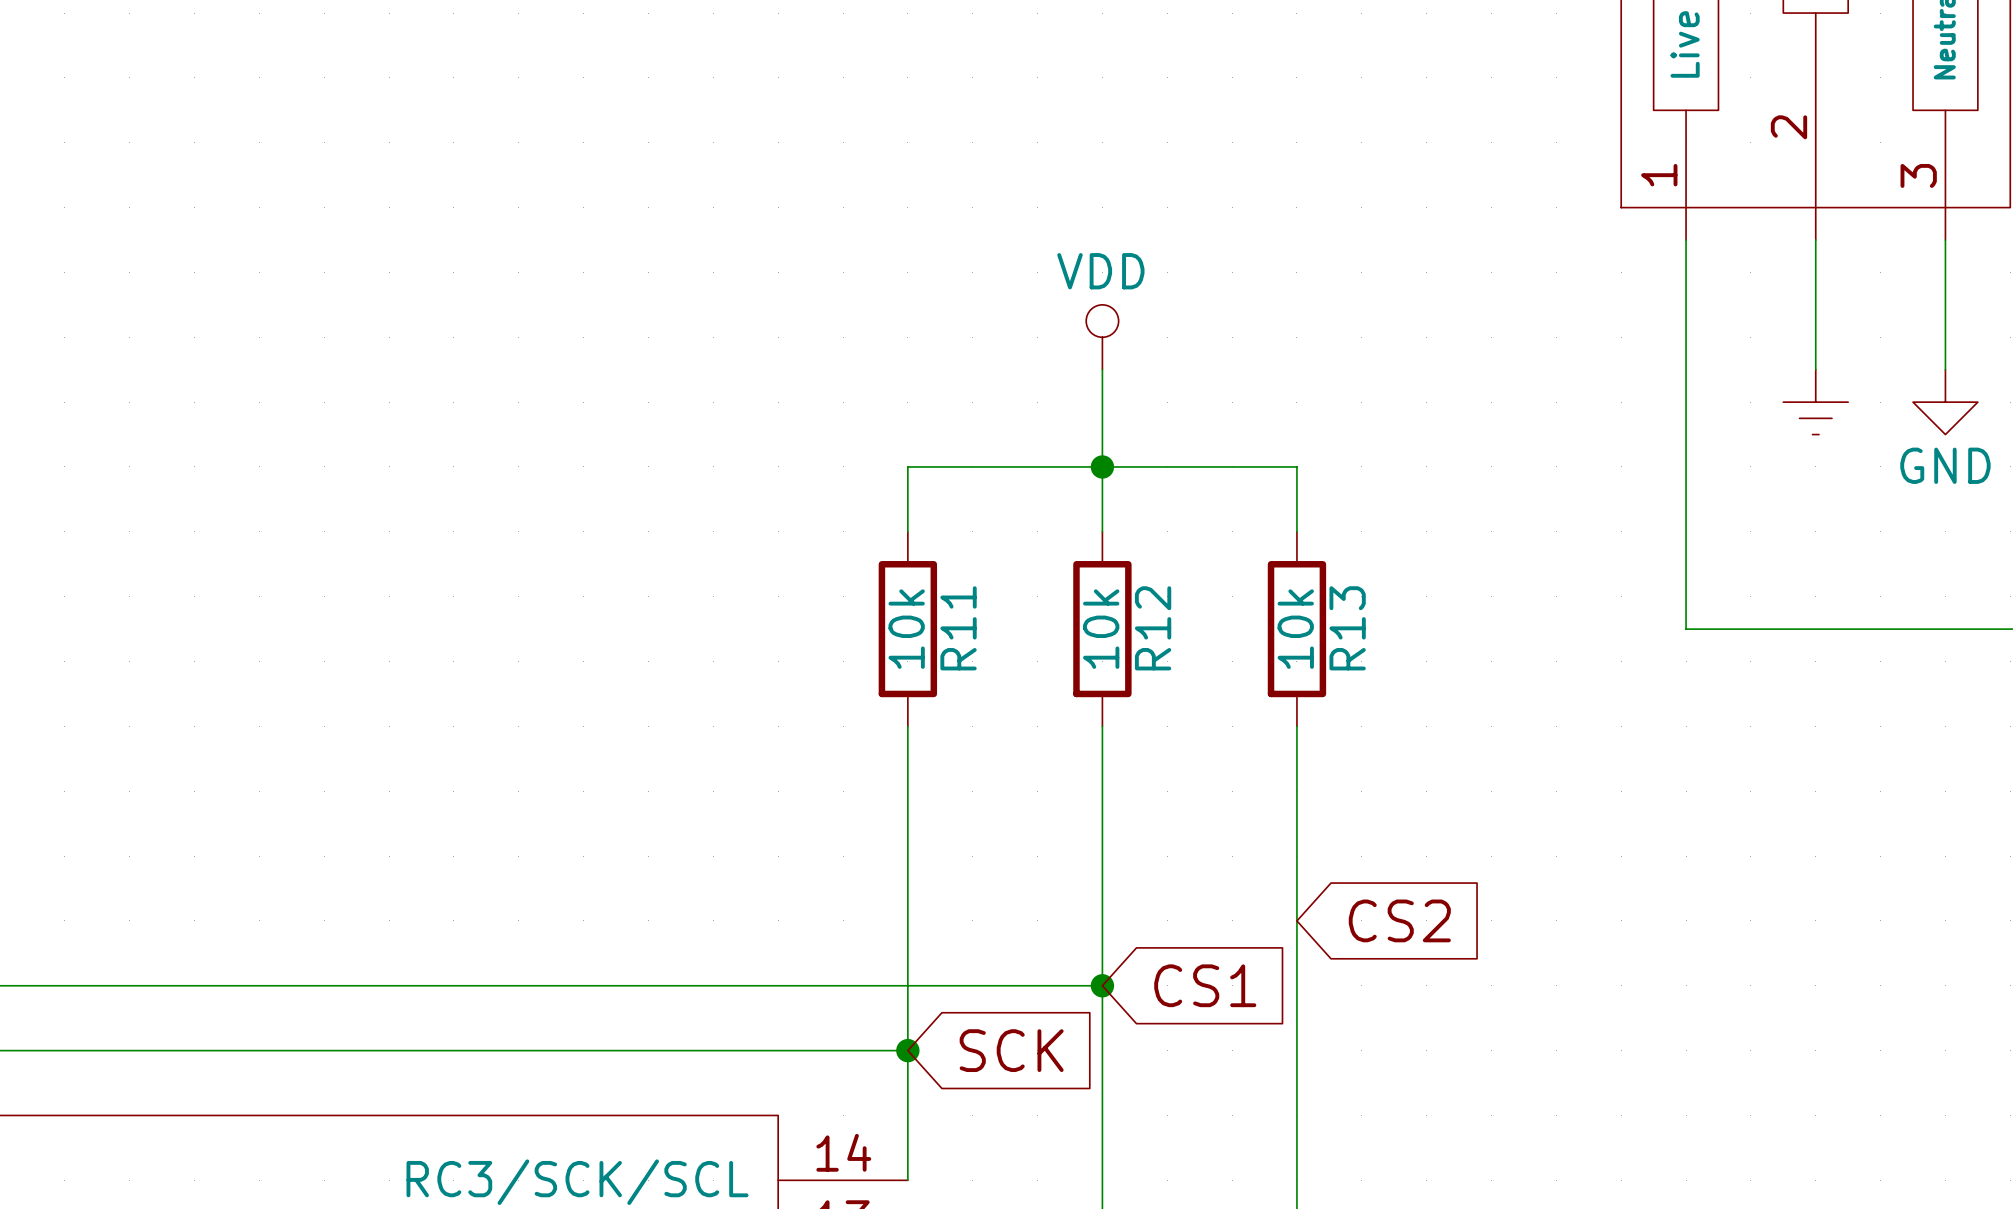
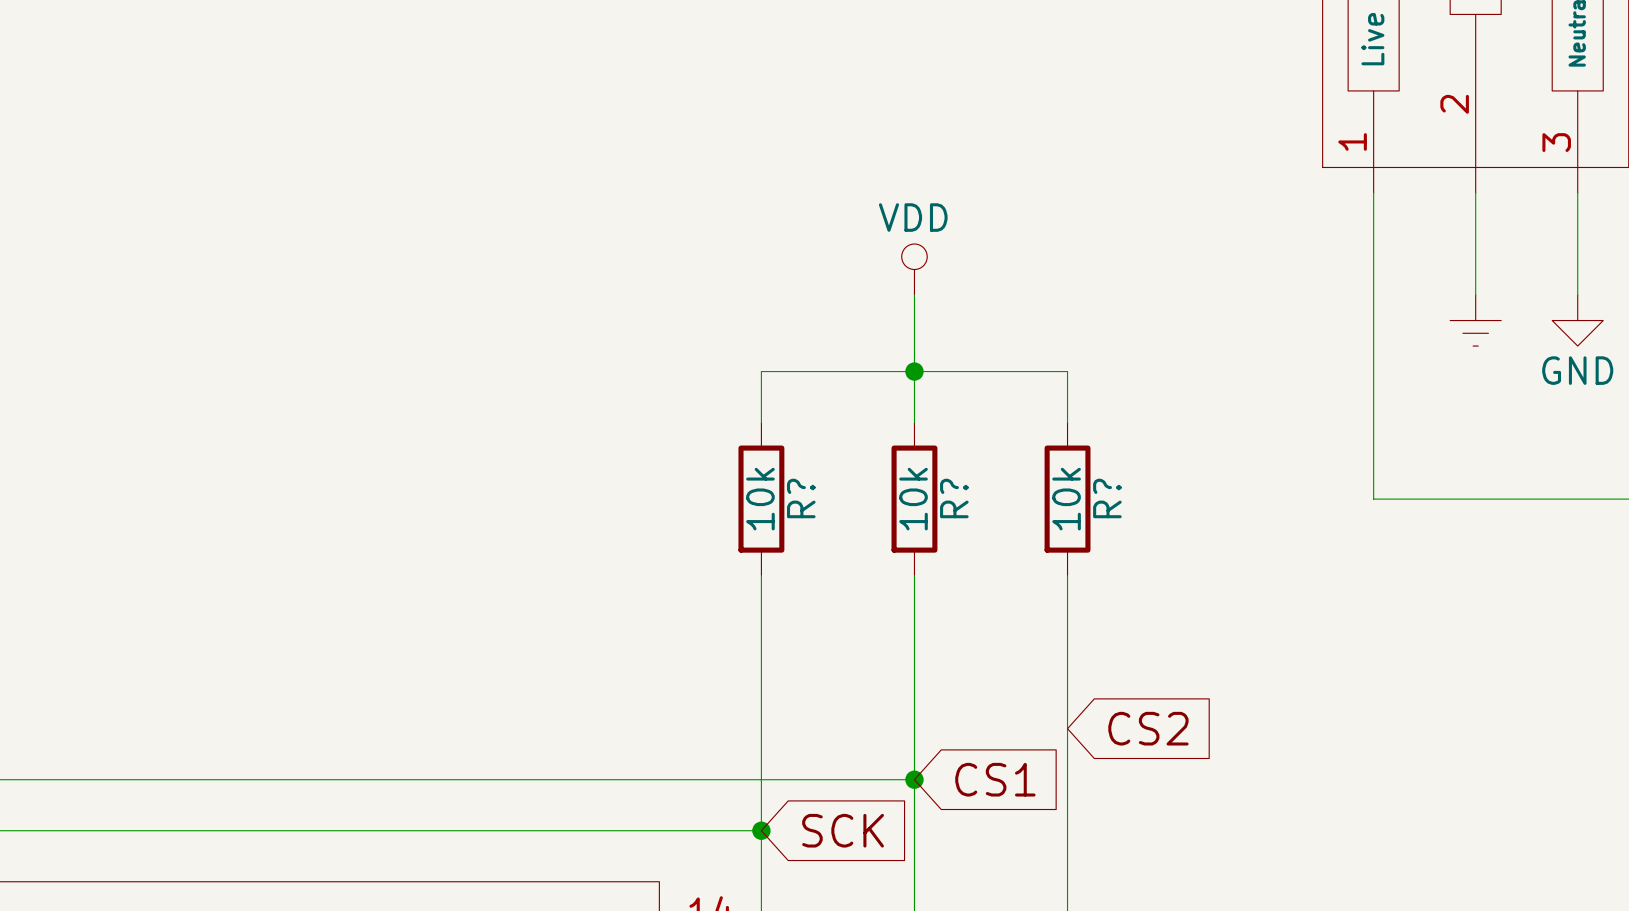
R11 name: R11 (958, 628) -> R? (801, 498)
R12 name: R12 (1153, 628) -> R? (954, 498)
R13 name: R13 (1347, 628) -> R? (1107, 498)

